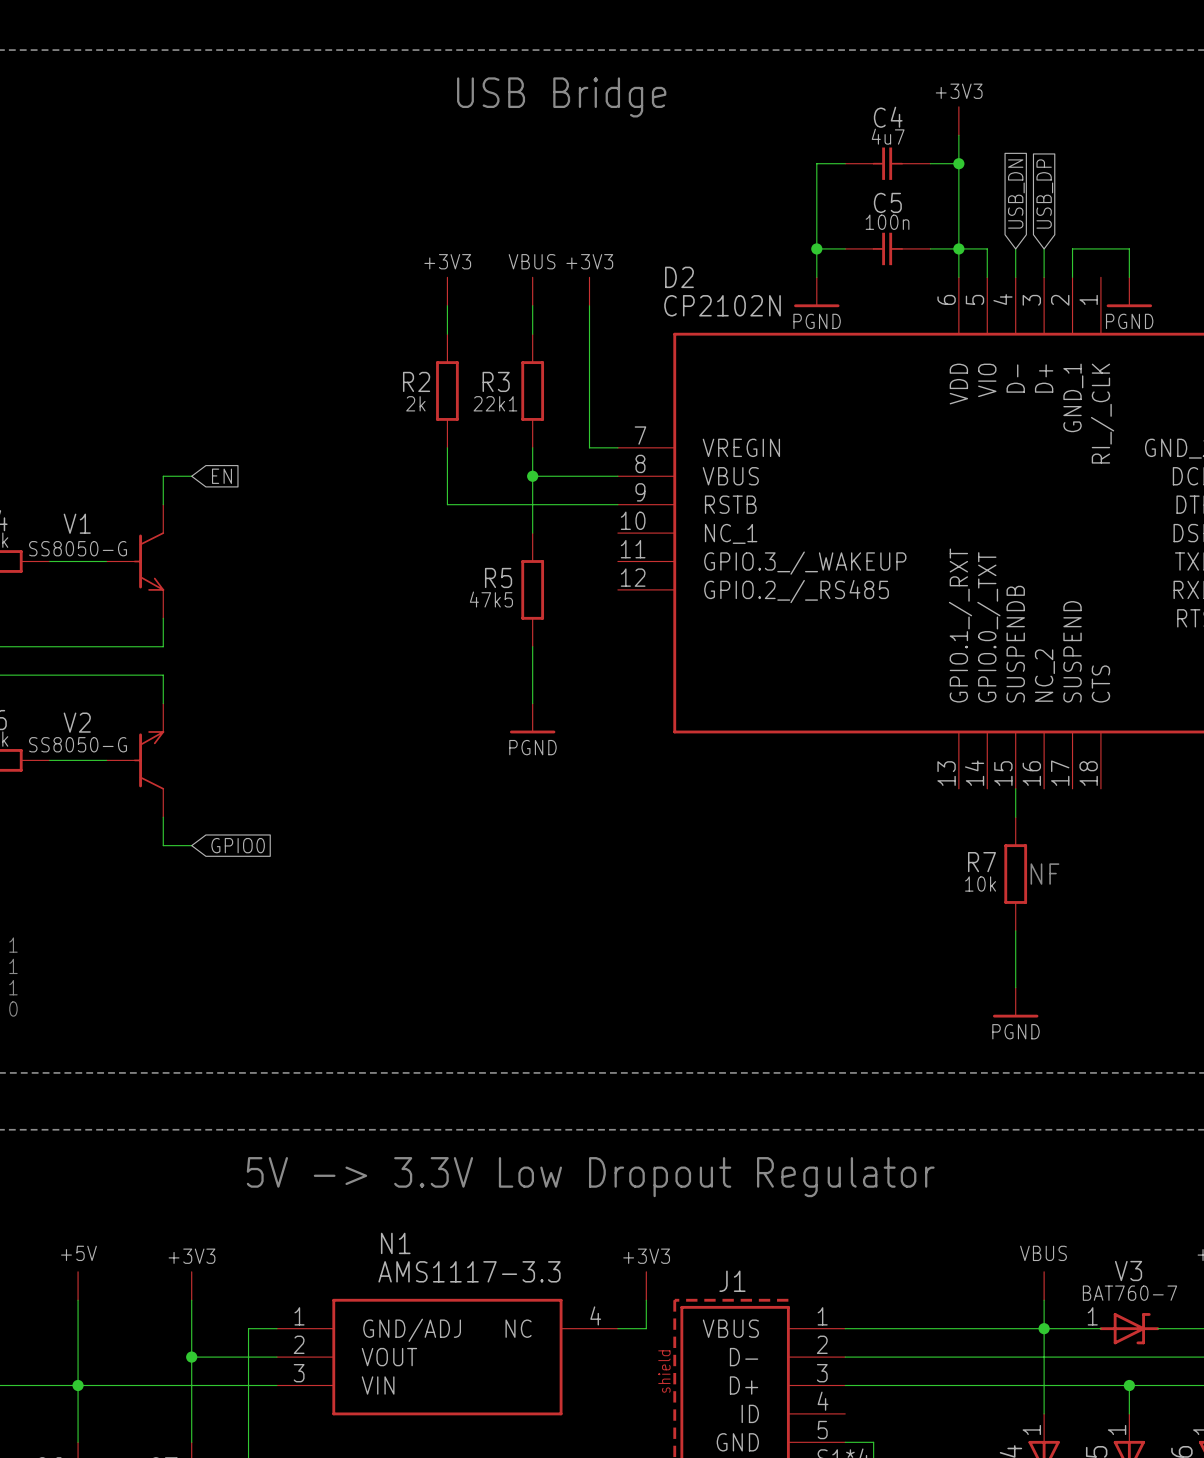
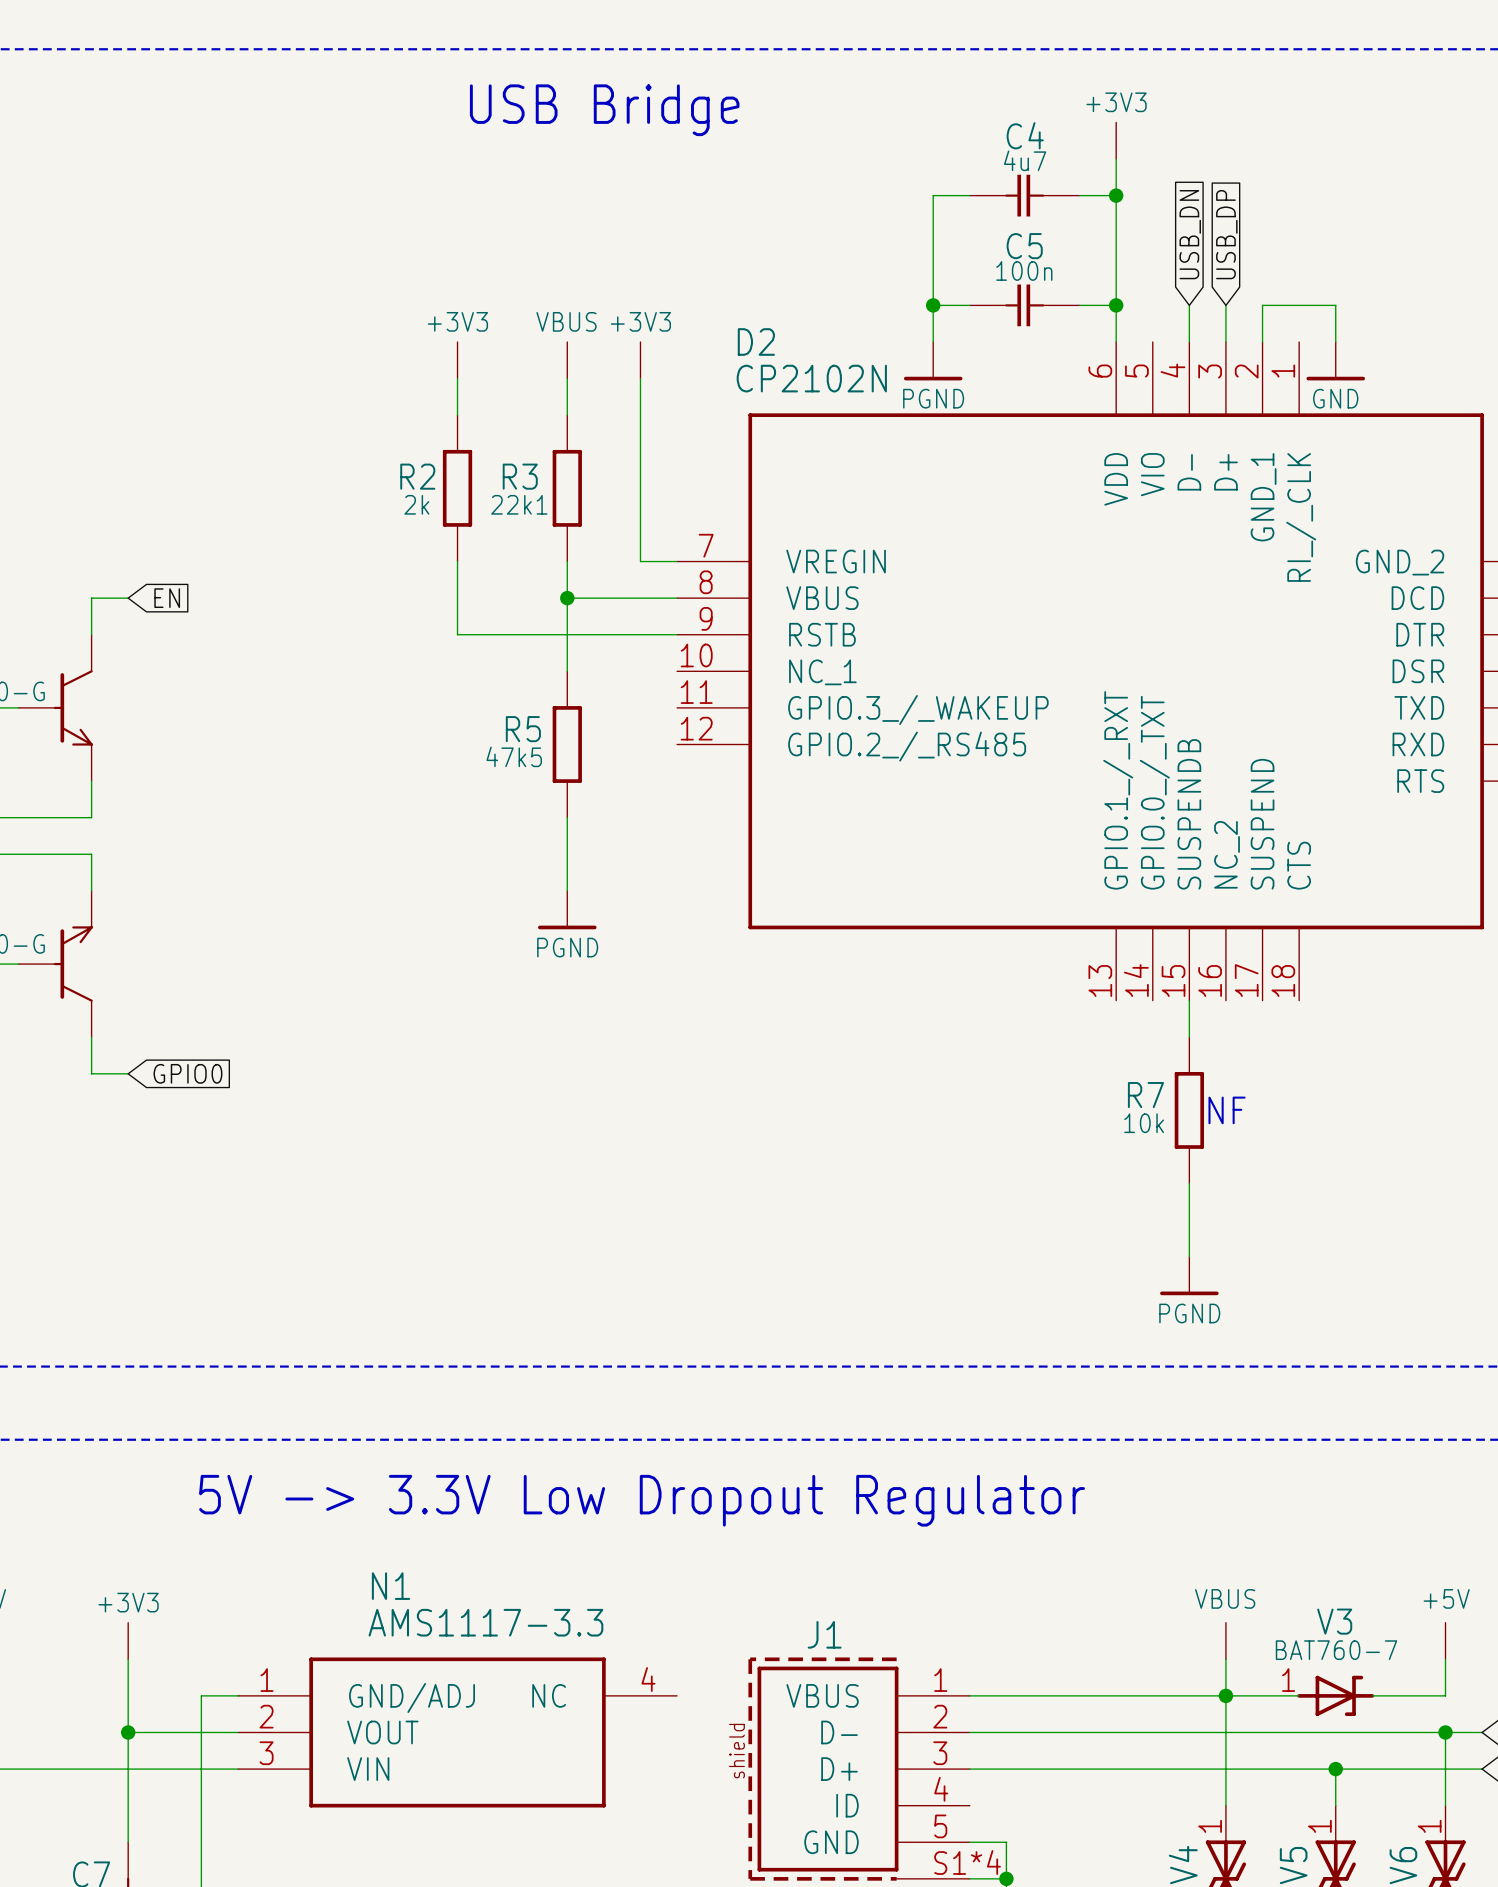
wire: (958, 248) (987, 248) (987, 277) -> none
power symbol: PGND (1129, 292) -> GND (1335, 361)
power symbol: +3V3 (646, 1286) -> none
wire: (646, 1300) (646, 1328) (617, 1328) -> none

